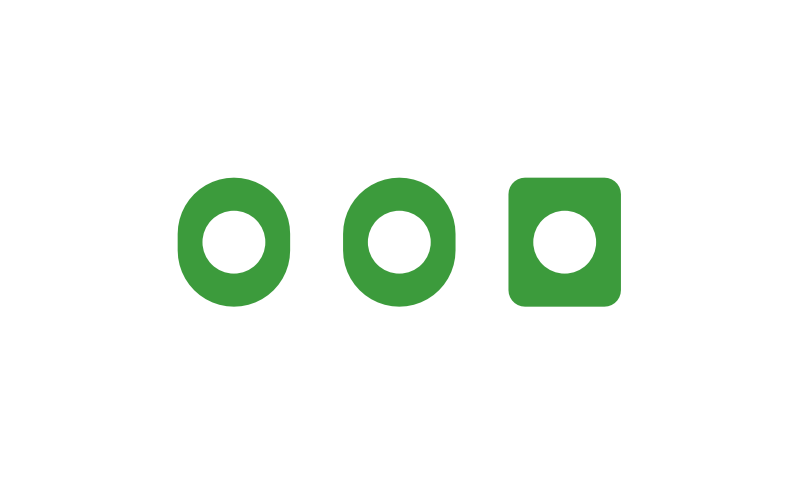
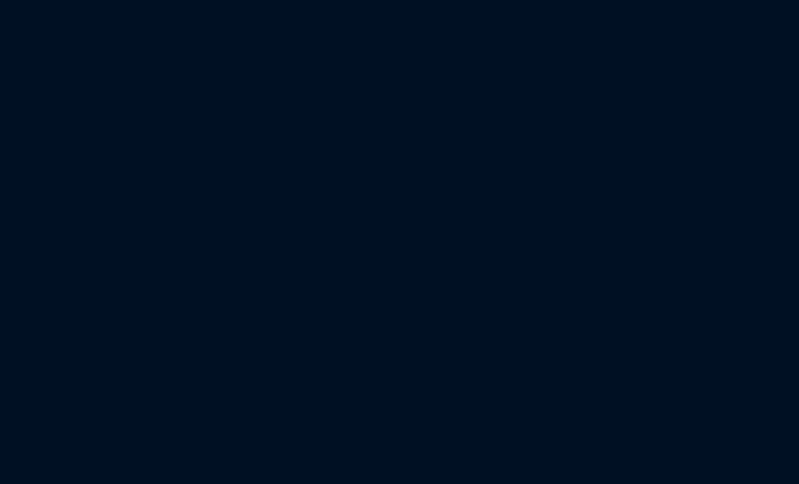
part: (399, 242) -> none

